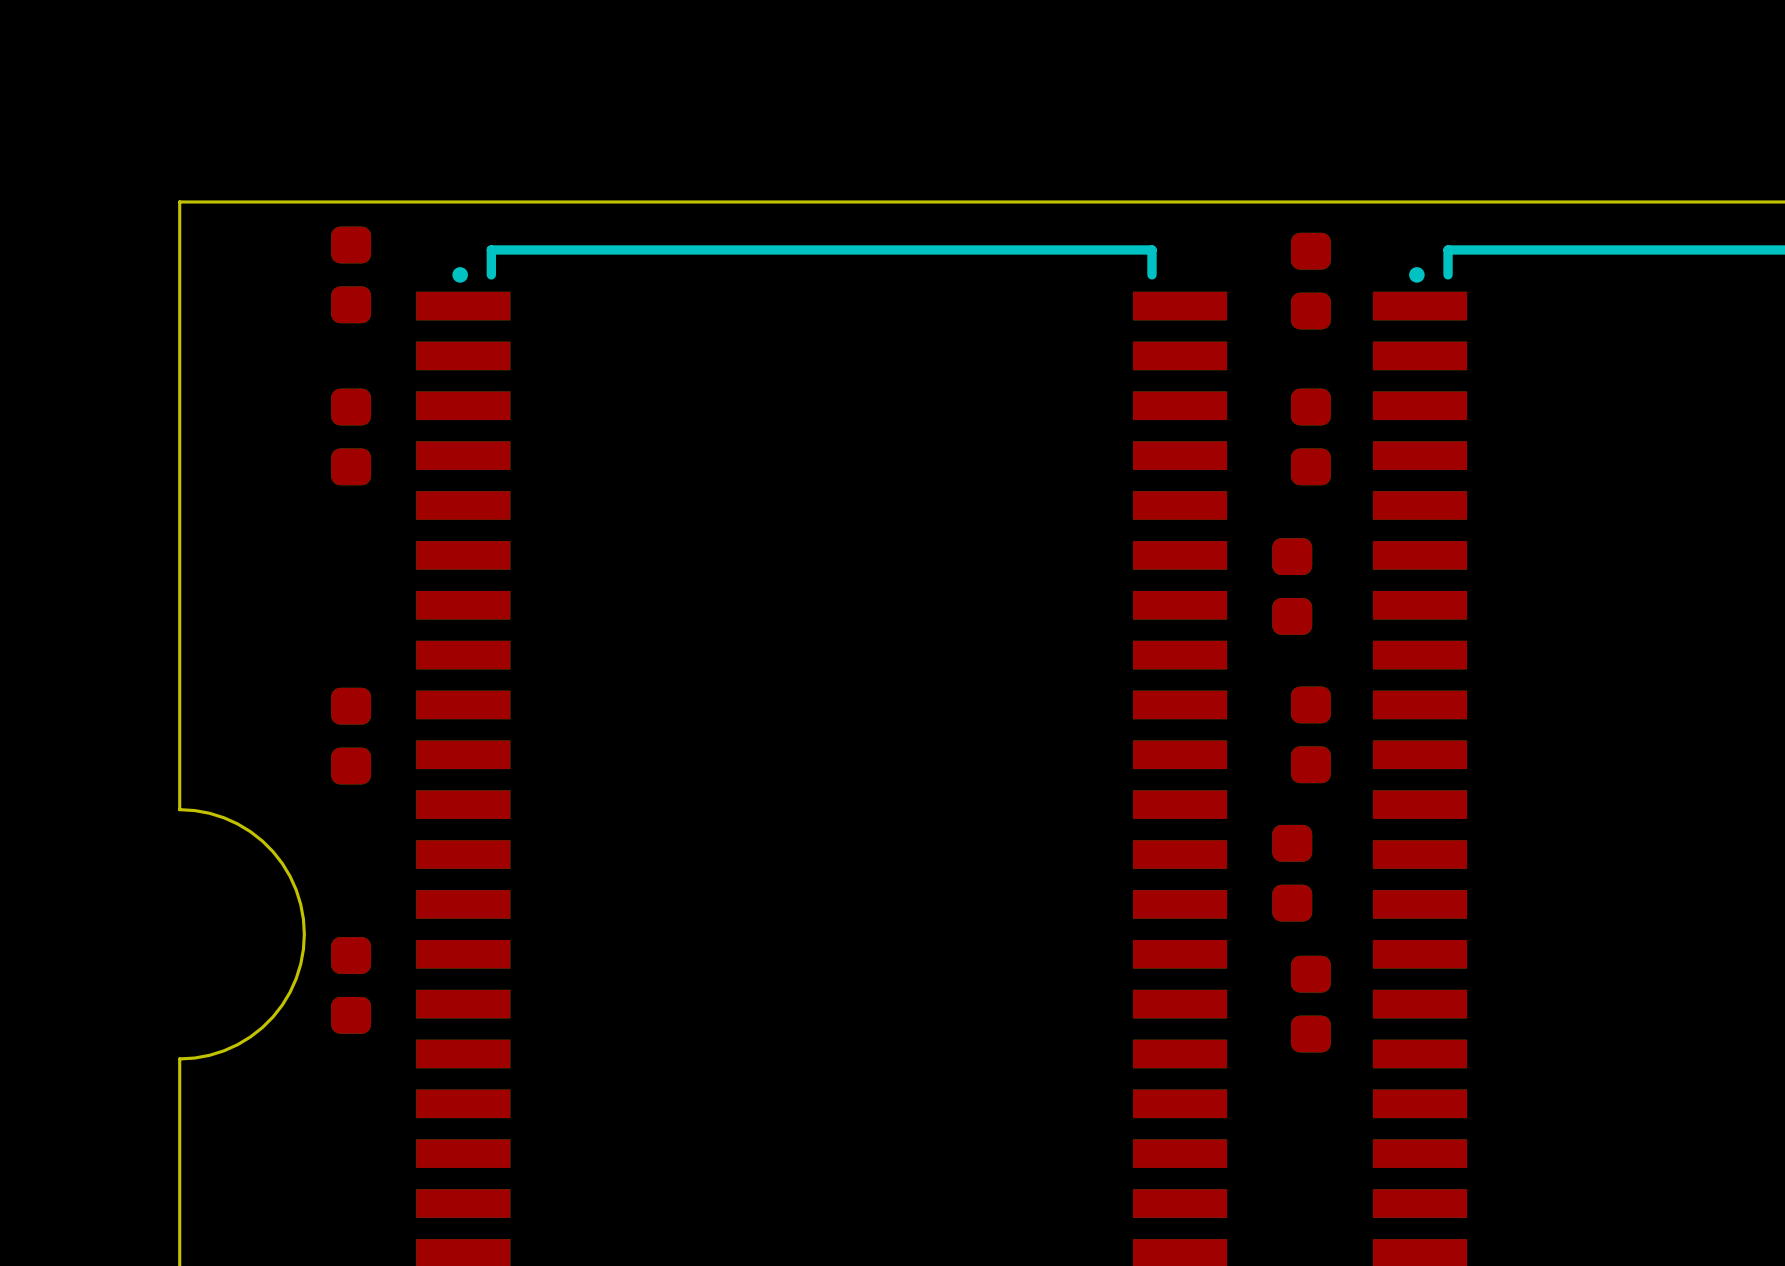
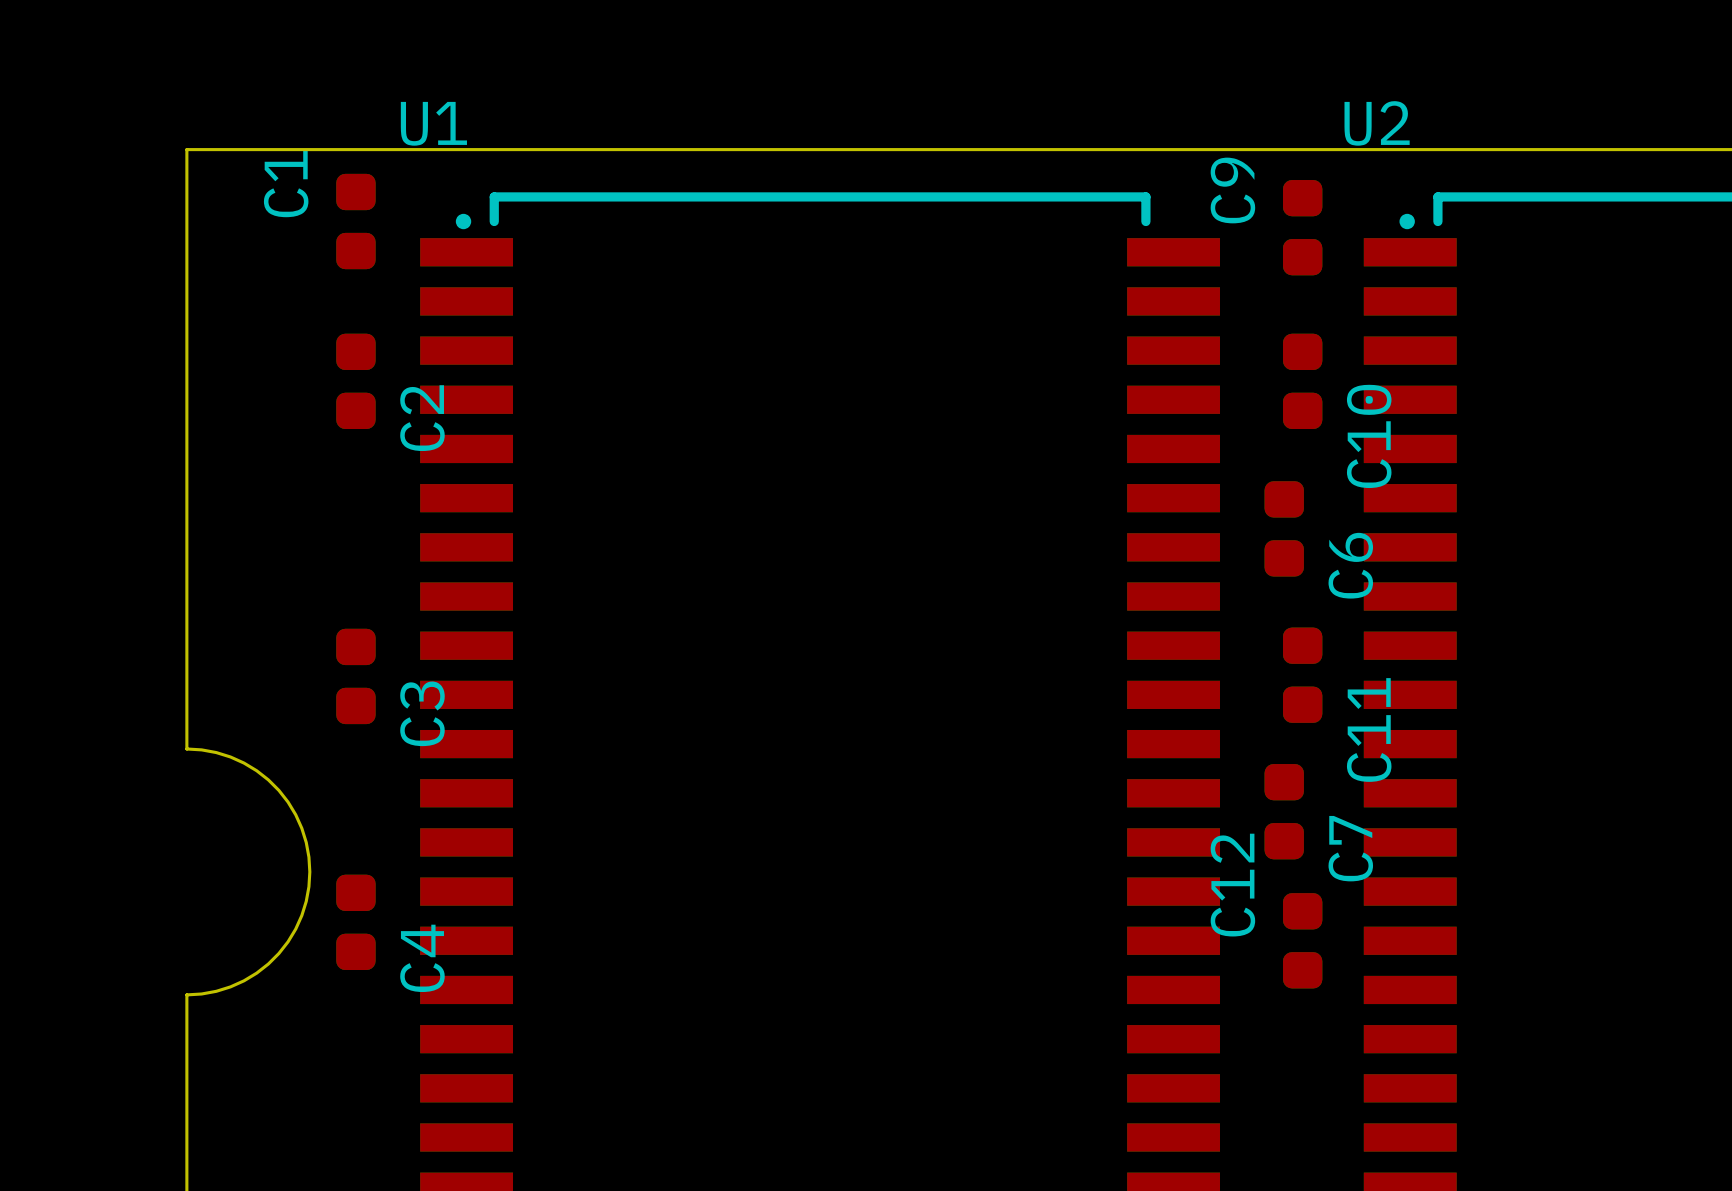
U1 name: none -> U1 (433, 123)
U2 name: none -> U2 (1377, 123)
C1 name: none -> C1 (286, 183)
C9 name: none -> C9 (1232, 190)
C2 name: none -> C2 (422, 418)
C10 name: none -> C10 (1369, 436)
C6 name: none -> C6 (1350, 565)
C3 name: none -> C3 (422, 713)
C11 name: none -> C11 (1369, 729)
C7 name: none -> C7 (1350, 848)
C12 name: none -> C12 (1232, 885)
C4 name: none -> C4 (422, 958)

